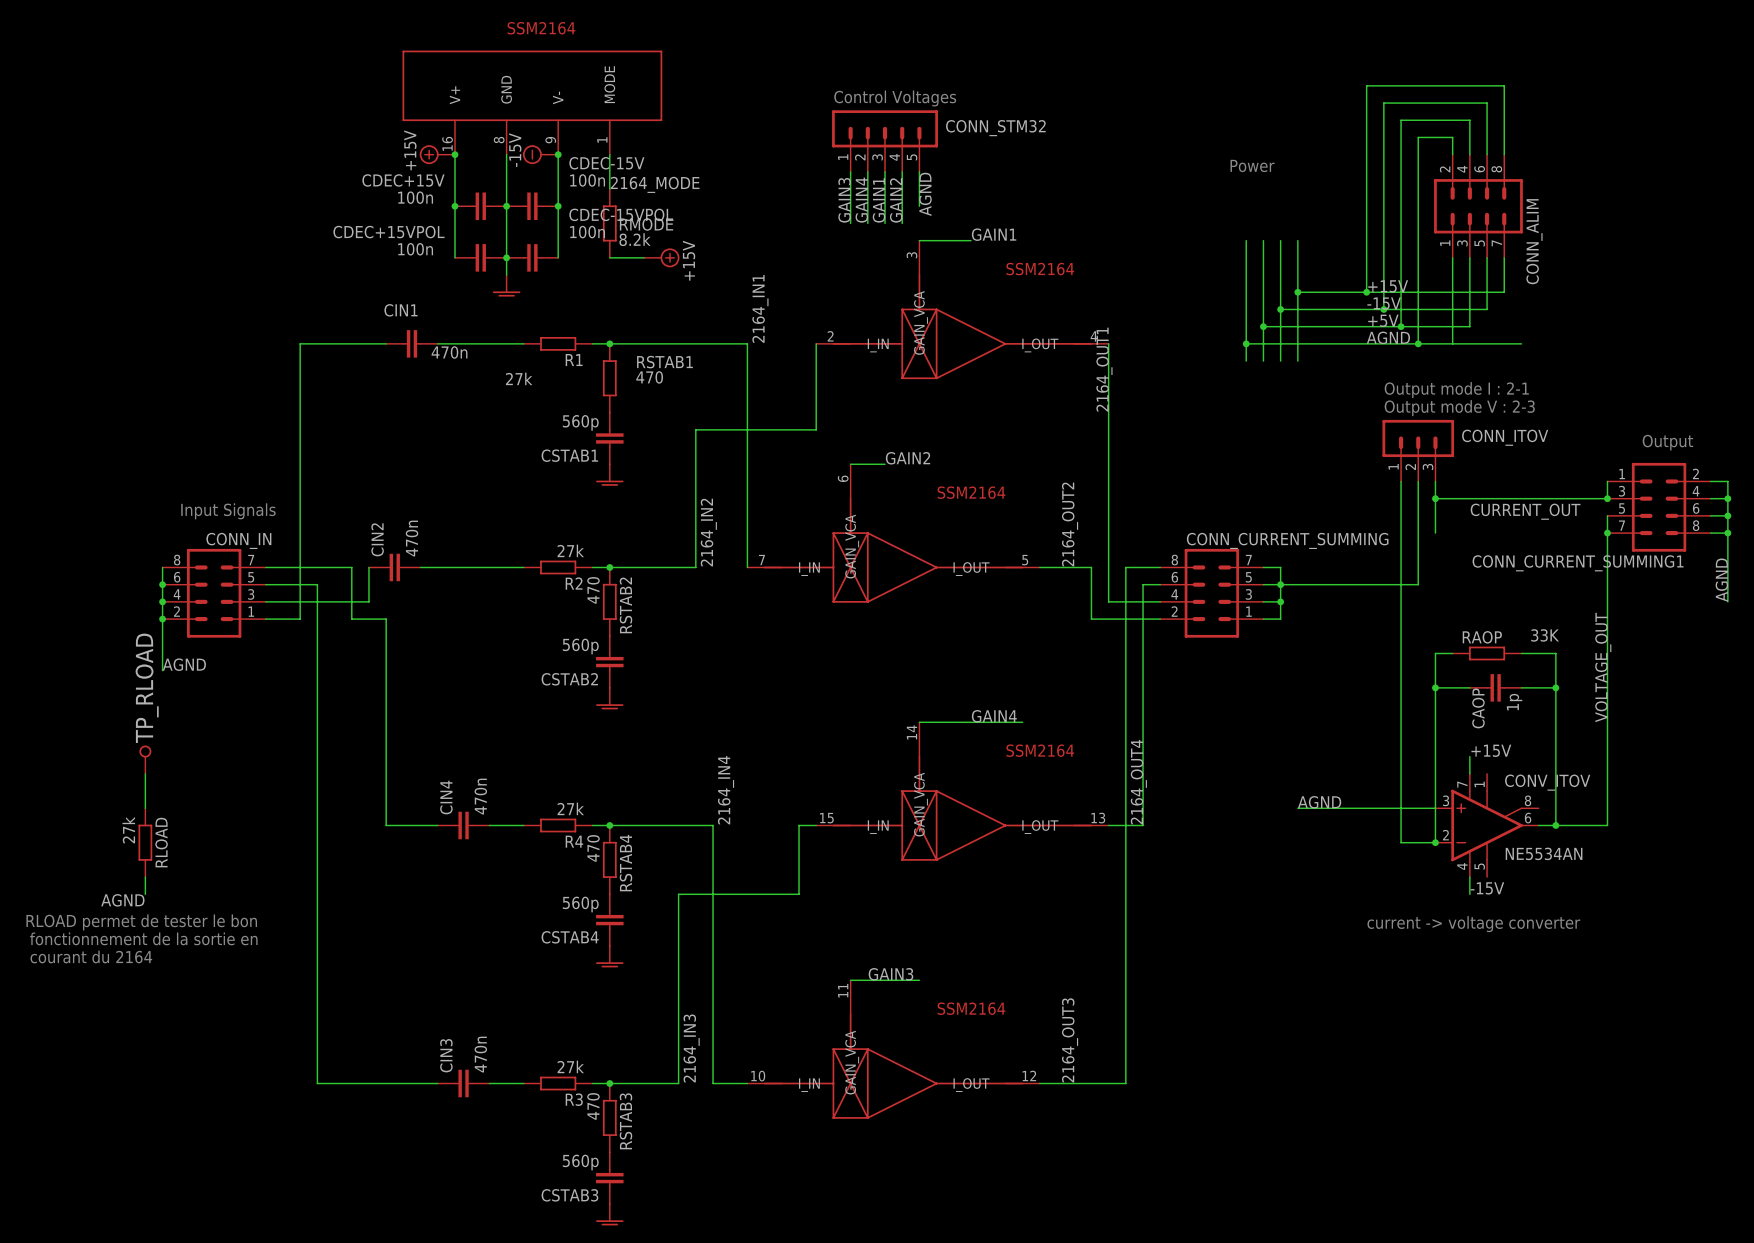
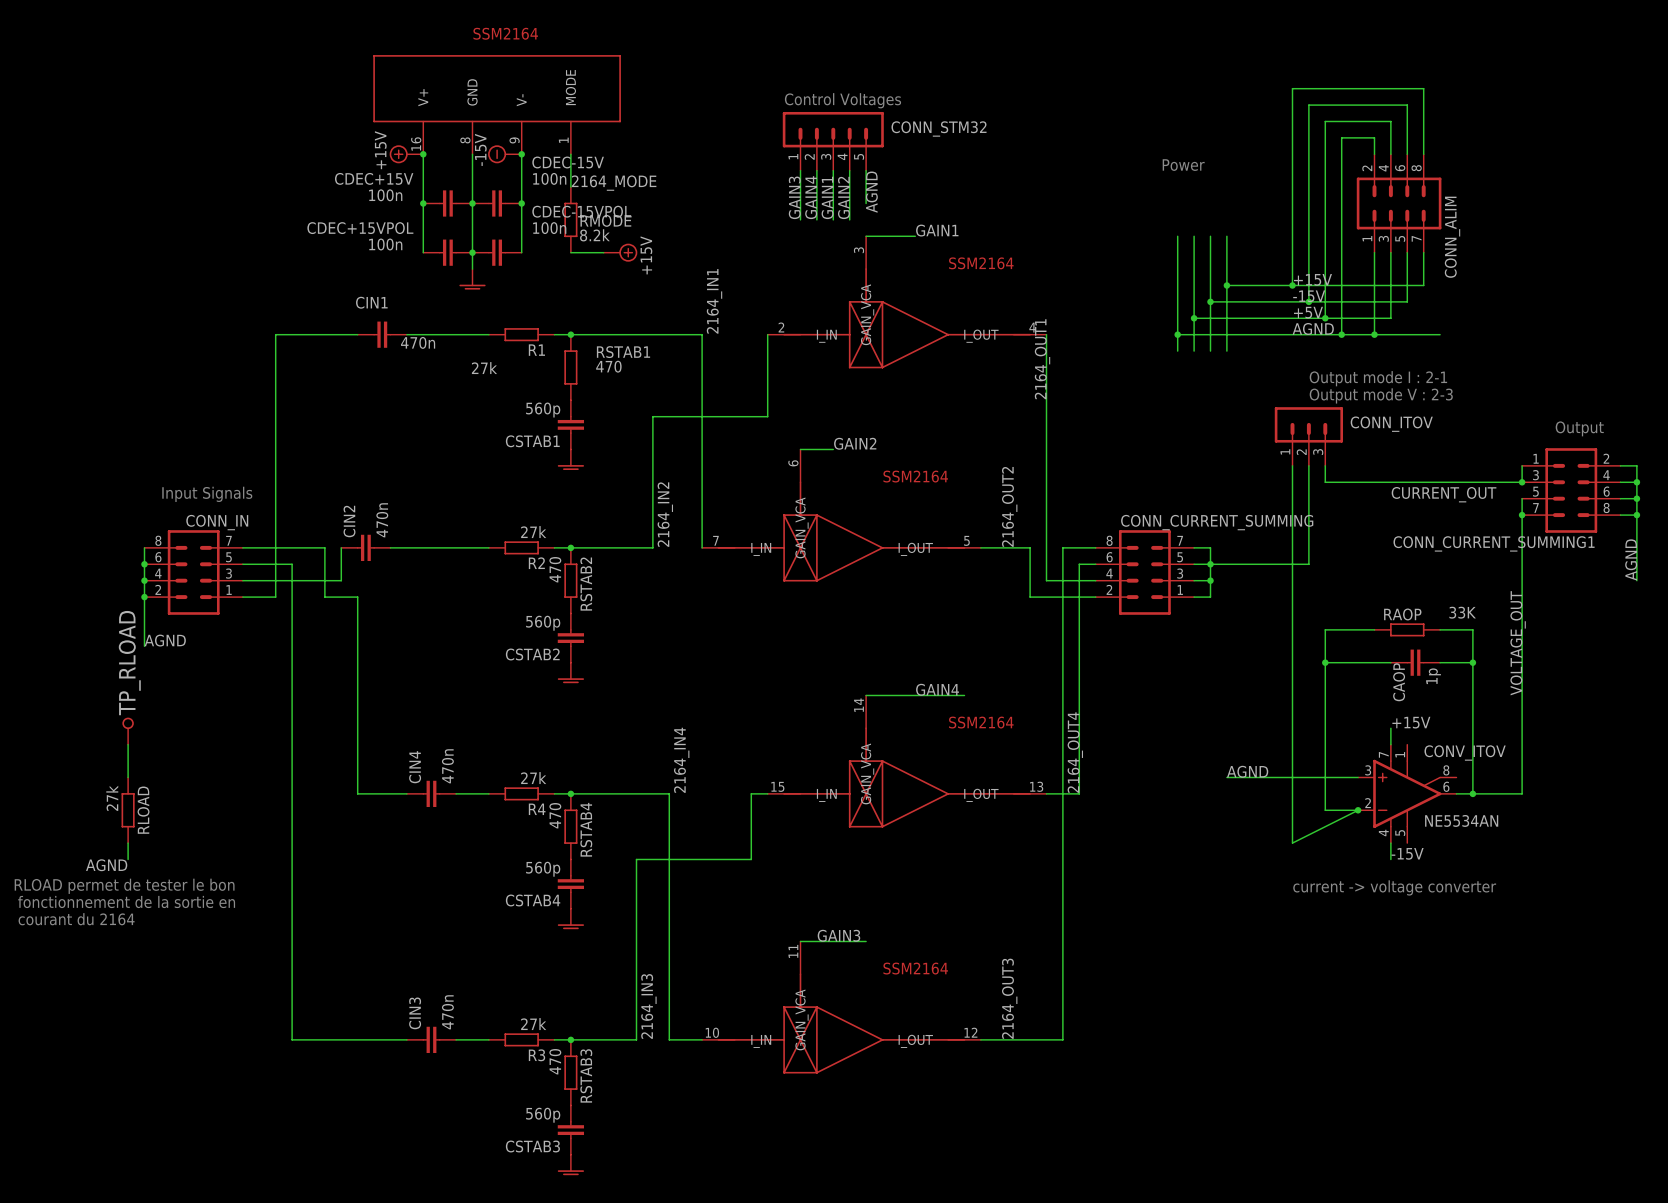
junction: none -> (1374, 334)
CONN_ITOV position: (1418, 450) -> (1308, 436)
wire: (1418, 481) (1418, 584) (1383, 584) -> (1308, 465) (1308, 564)
wire: (1435, 481) (1435, 533) -> none
wire: (1401, 498) (1401, 653) -> (1325, 482) (1358, 482)
junction: (1435, 498) -> none
wire: none -> (1325, 629) (1358, 629)
wire: (1435, 653) (1435, 842) -> (1292, 465) (1292, 843) (1358, 810)
wire: none -> (1325, 662) (1358, 662)
junction position: (1435, 687) -> (1325, 662)

